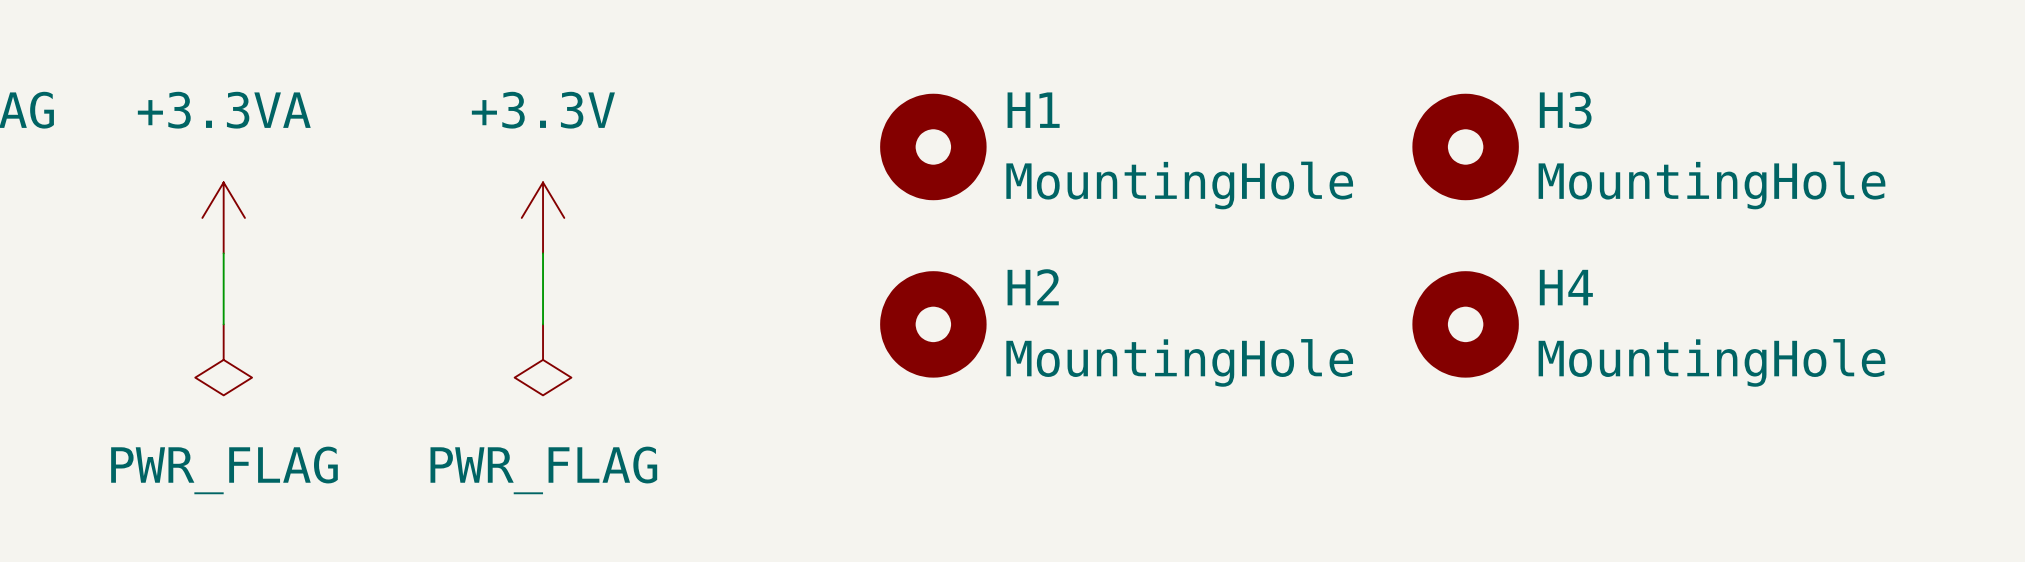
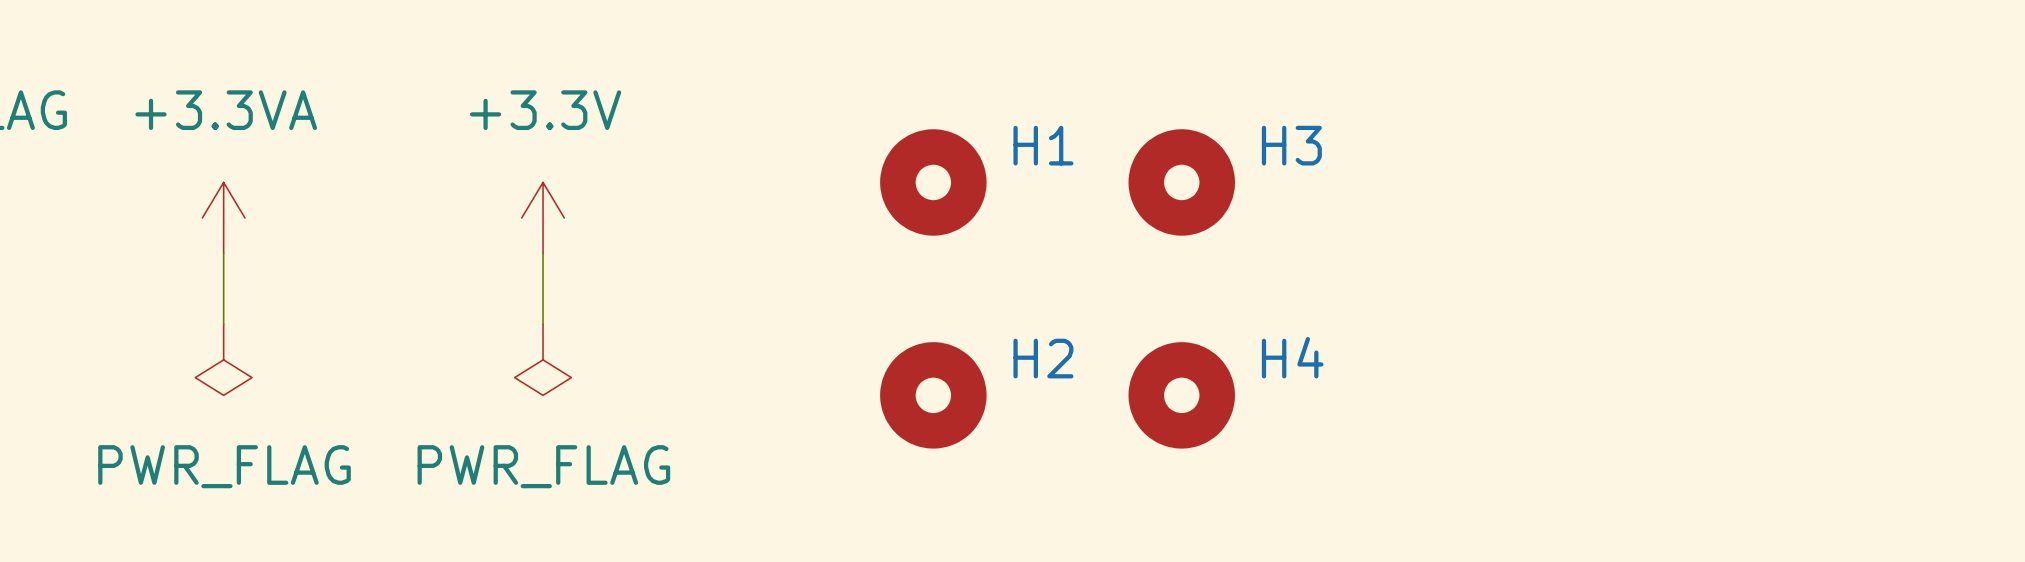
H1 position: (933, 146) -> (933, 182)
H3 position: (1465, 146) -> (1181, 182)
H1 value: MountingHole (1179, 185) -> none
H3 value: MountingHole (1711, 185) -> none
H2 position: (933, 324) -> (933, 395)
H4 position: (1465, 324) -> (1181, 395)
H2 value: MountingHole (1179, 362) -> none
H4 value: MountingHole (1711, 362) -> none

